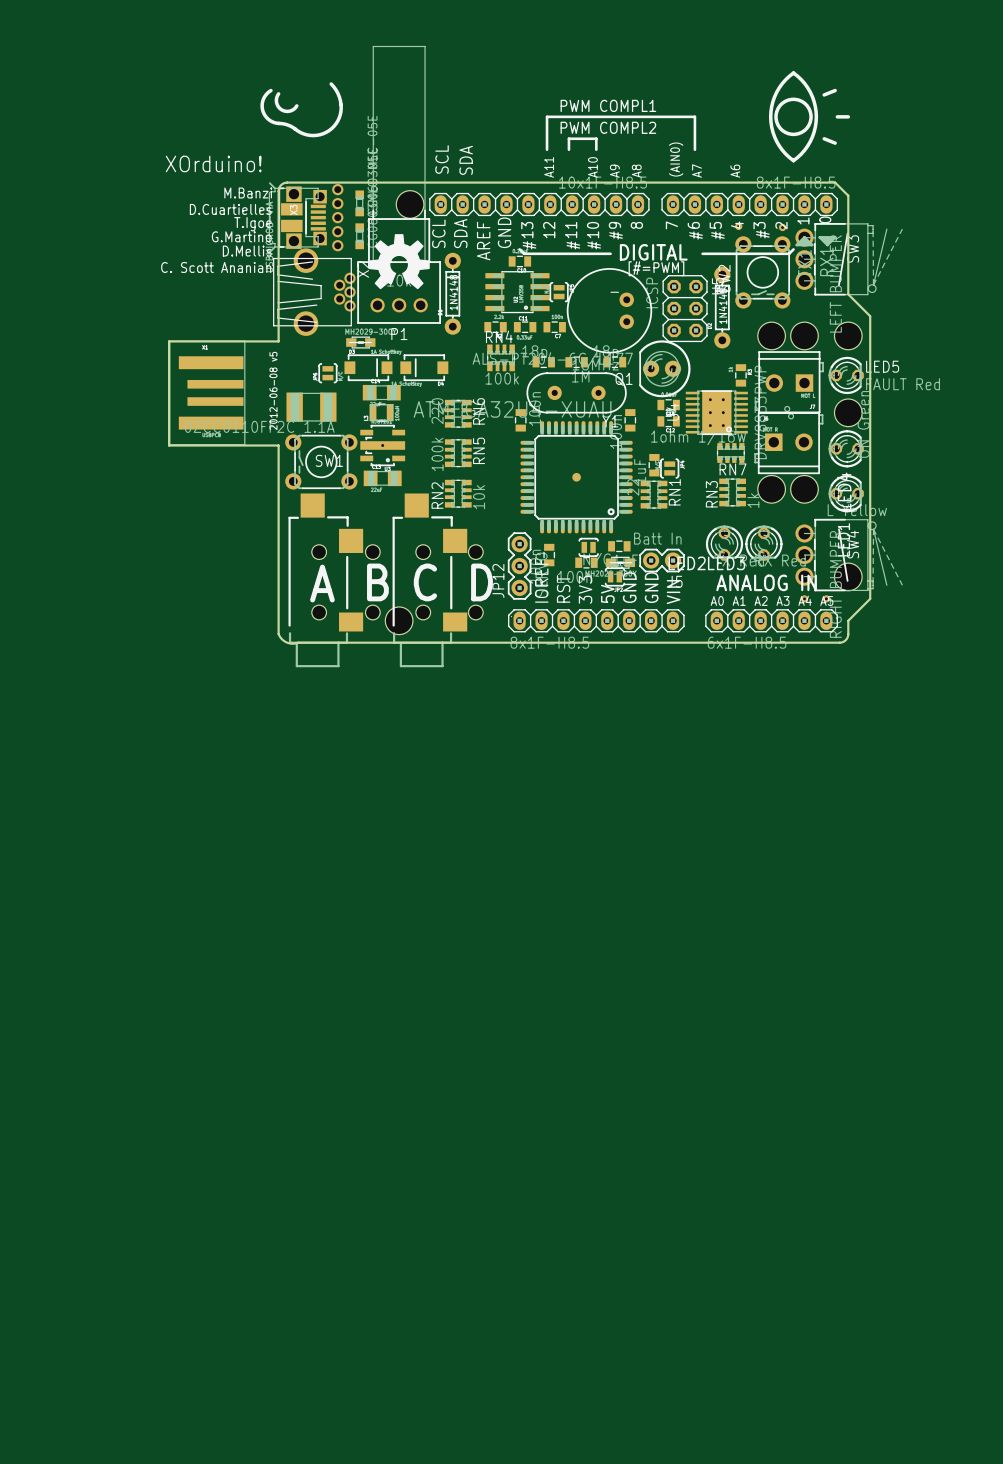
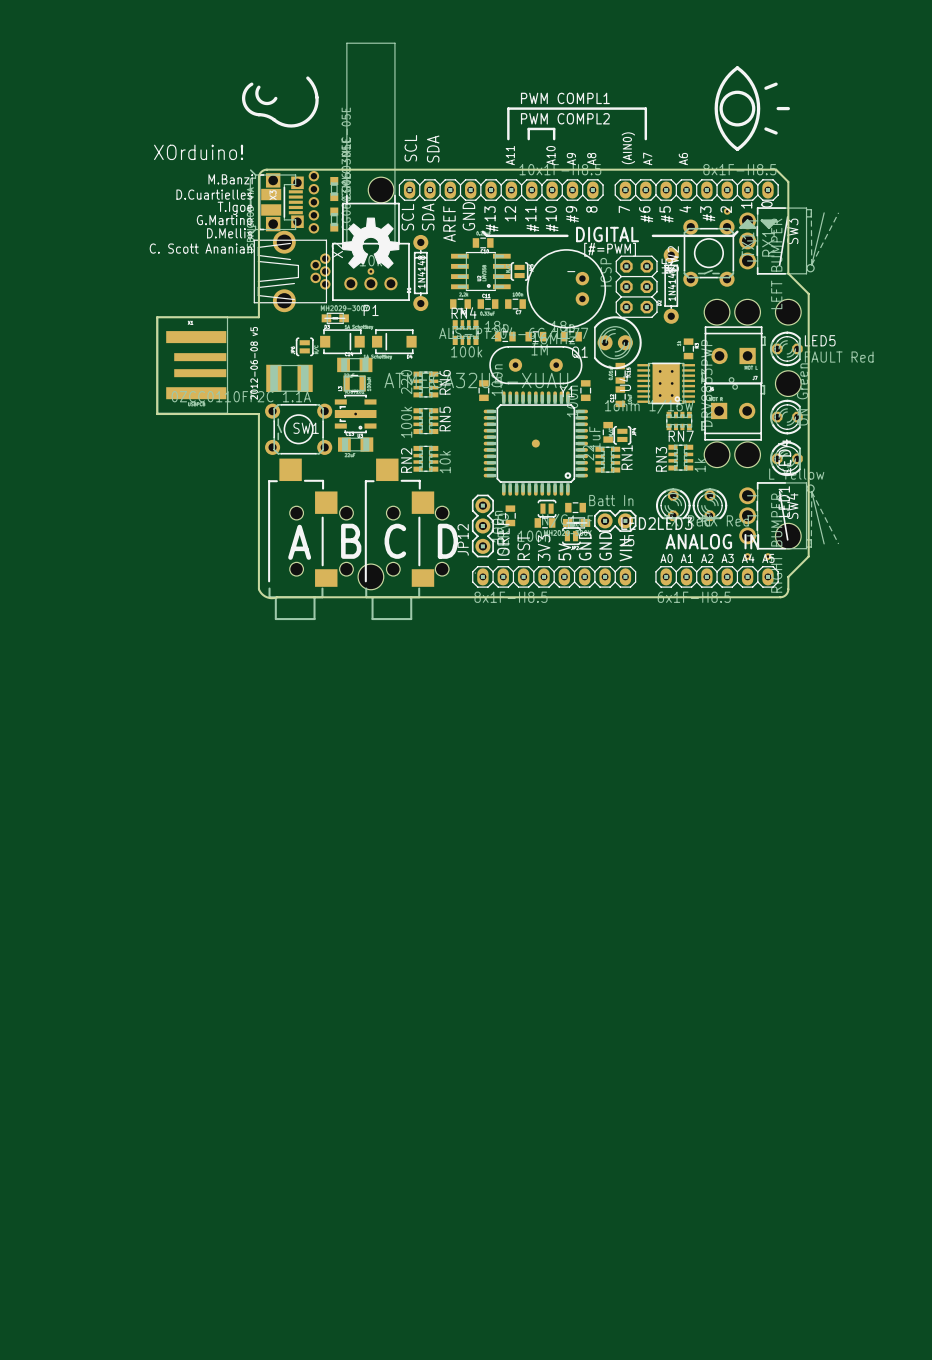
part: (738, 226) -> none
part: none -> (370, 271)
part rotation: 0° (668, 404) -> 90° clockwise (620, 373)
part rotation: 0° (668, 421) -> 90° clockwise (620, 396)

